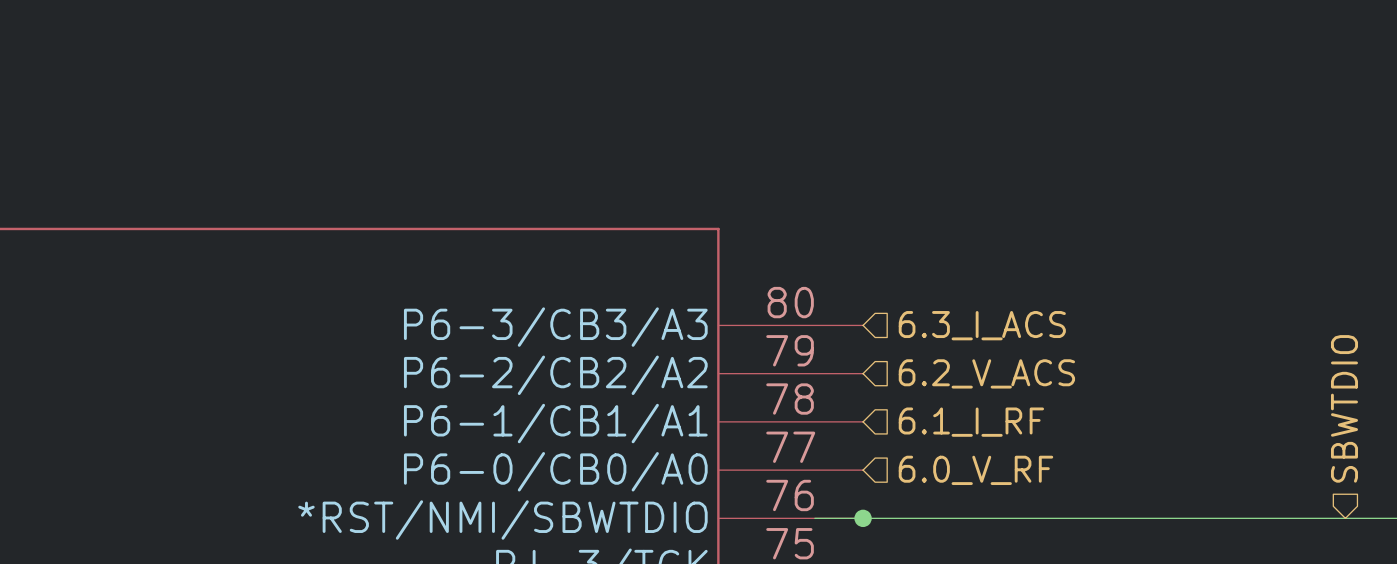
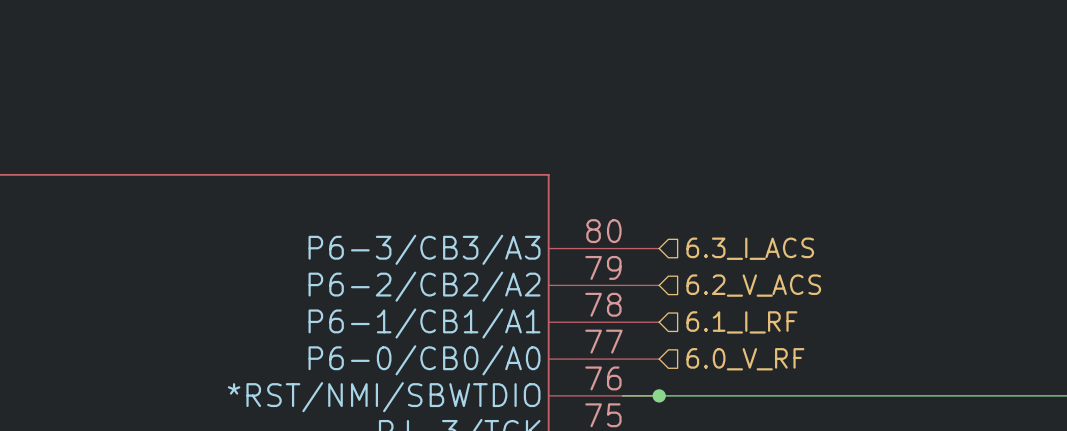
hierarchical label: SBWTDIO (1344, 408) -> none

